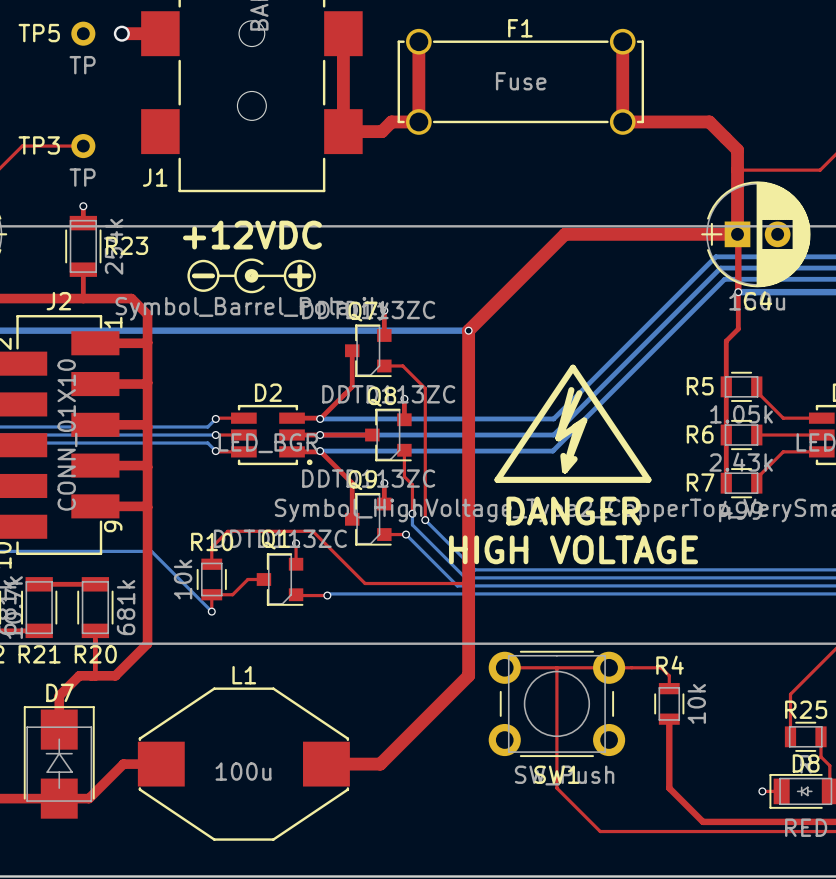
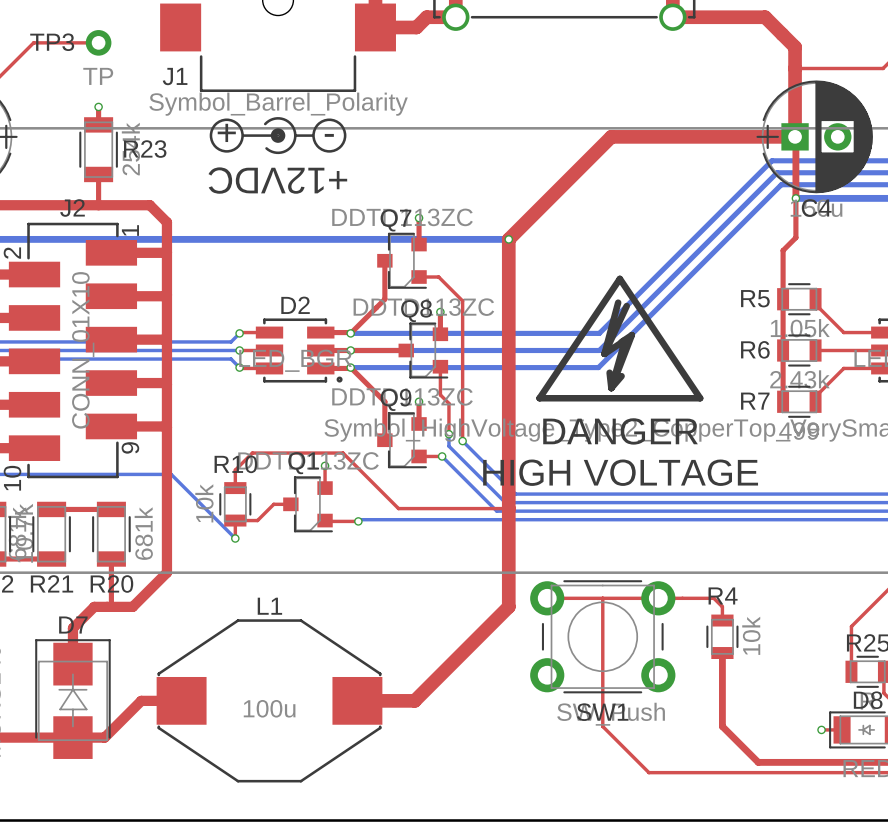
drawing: none -> [209, 117, 347, 155]
text rotation: 0° (252, 235) -> 180° (277, 180)
drawing: [187, 258, 316, 294] -> none
text rotation: 0° (203, 275) -> 180° (329, 135)
text position: - (203, 275) -> - (329, 135)
text rotation: 0° (299, 275) -> 180° (226, 132)
text position: + (299, 275) -> + (226, 132)

